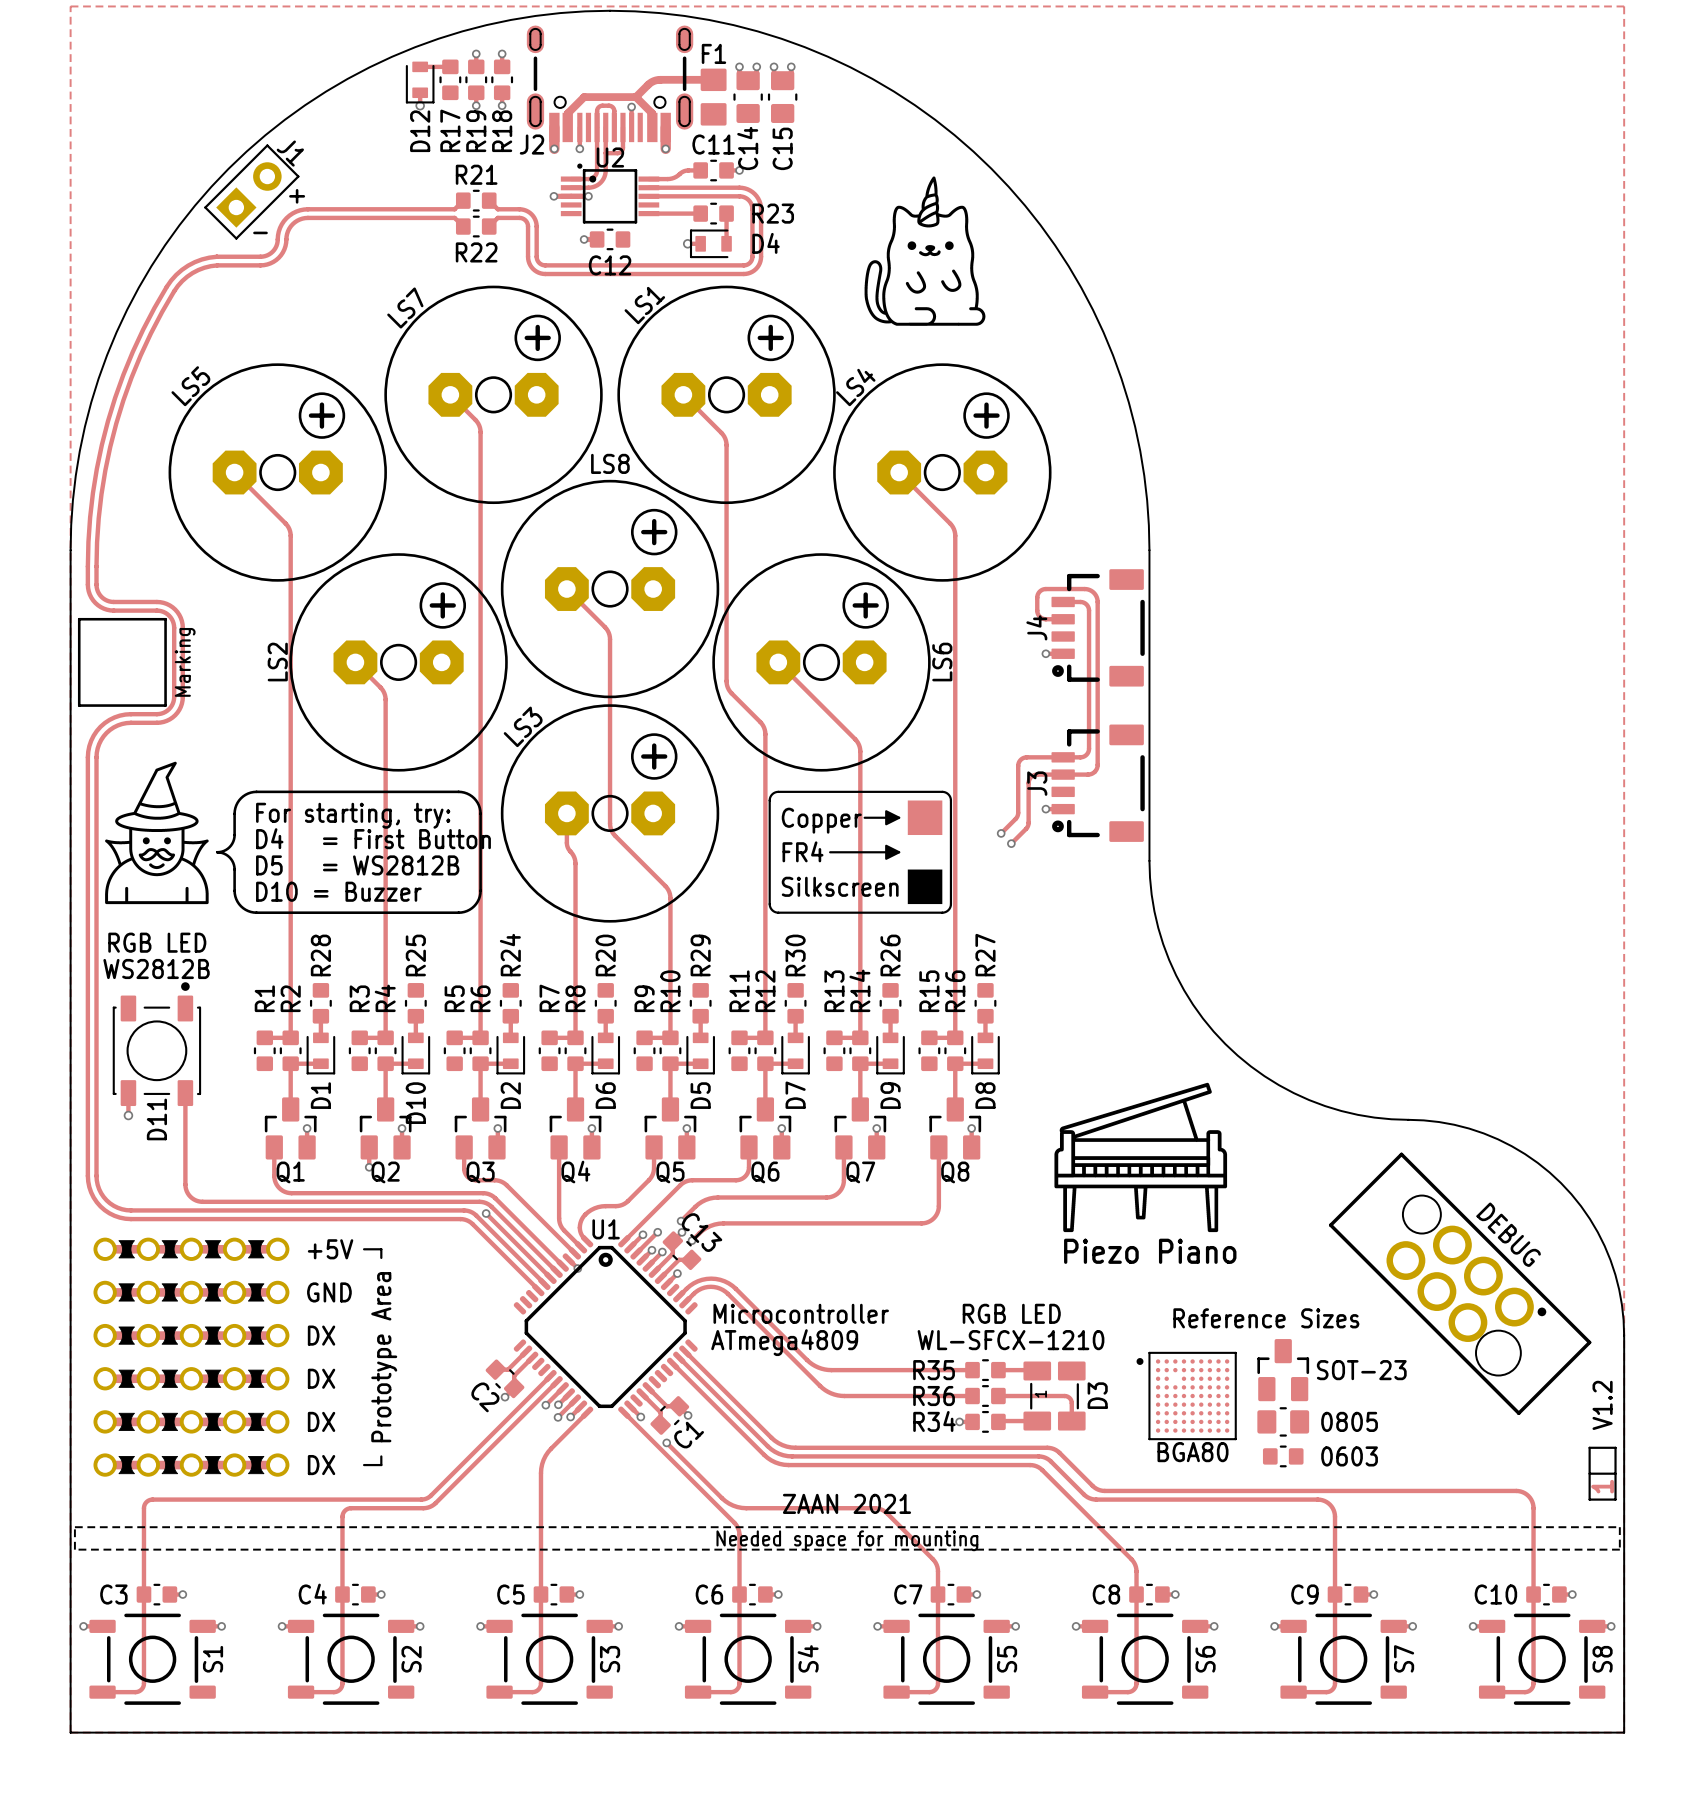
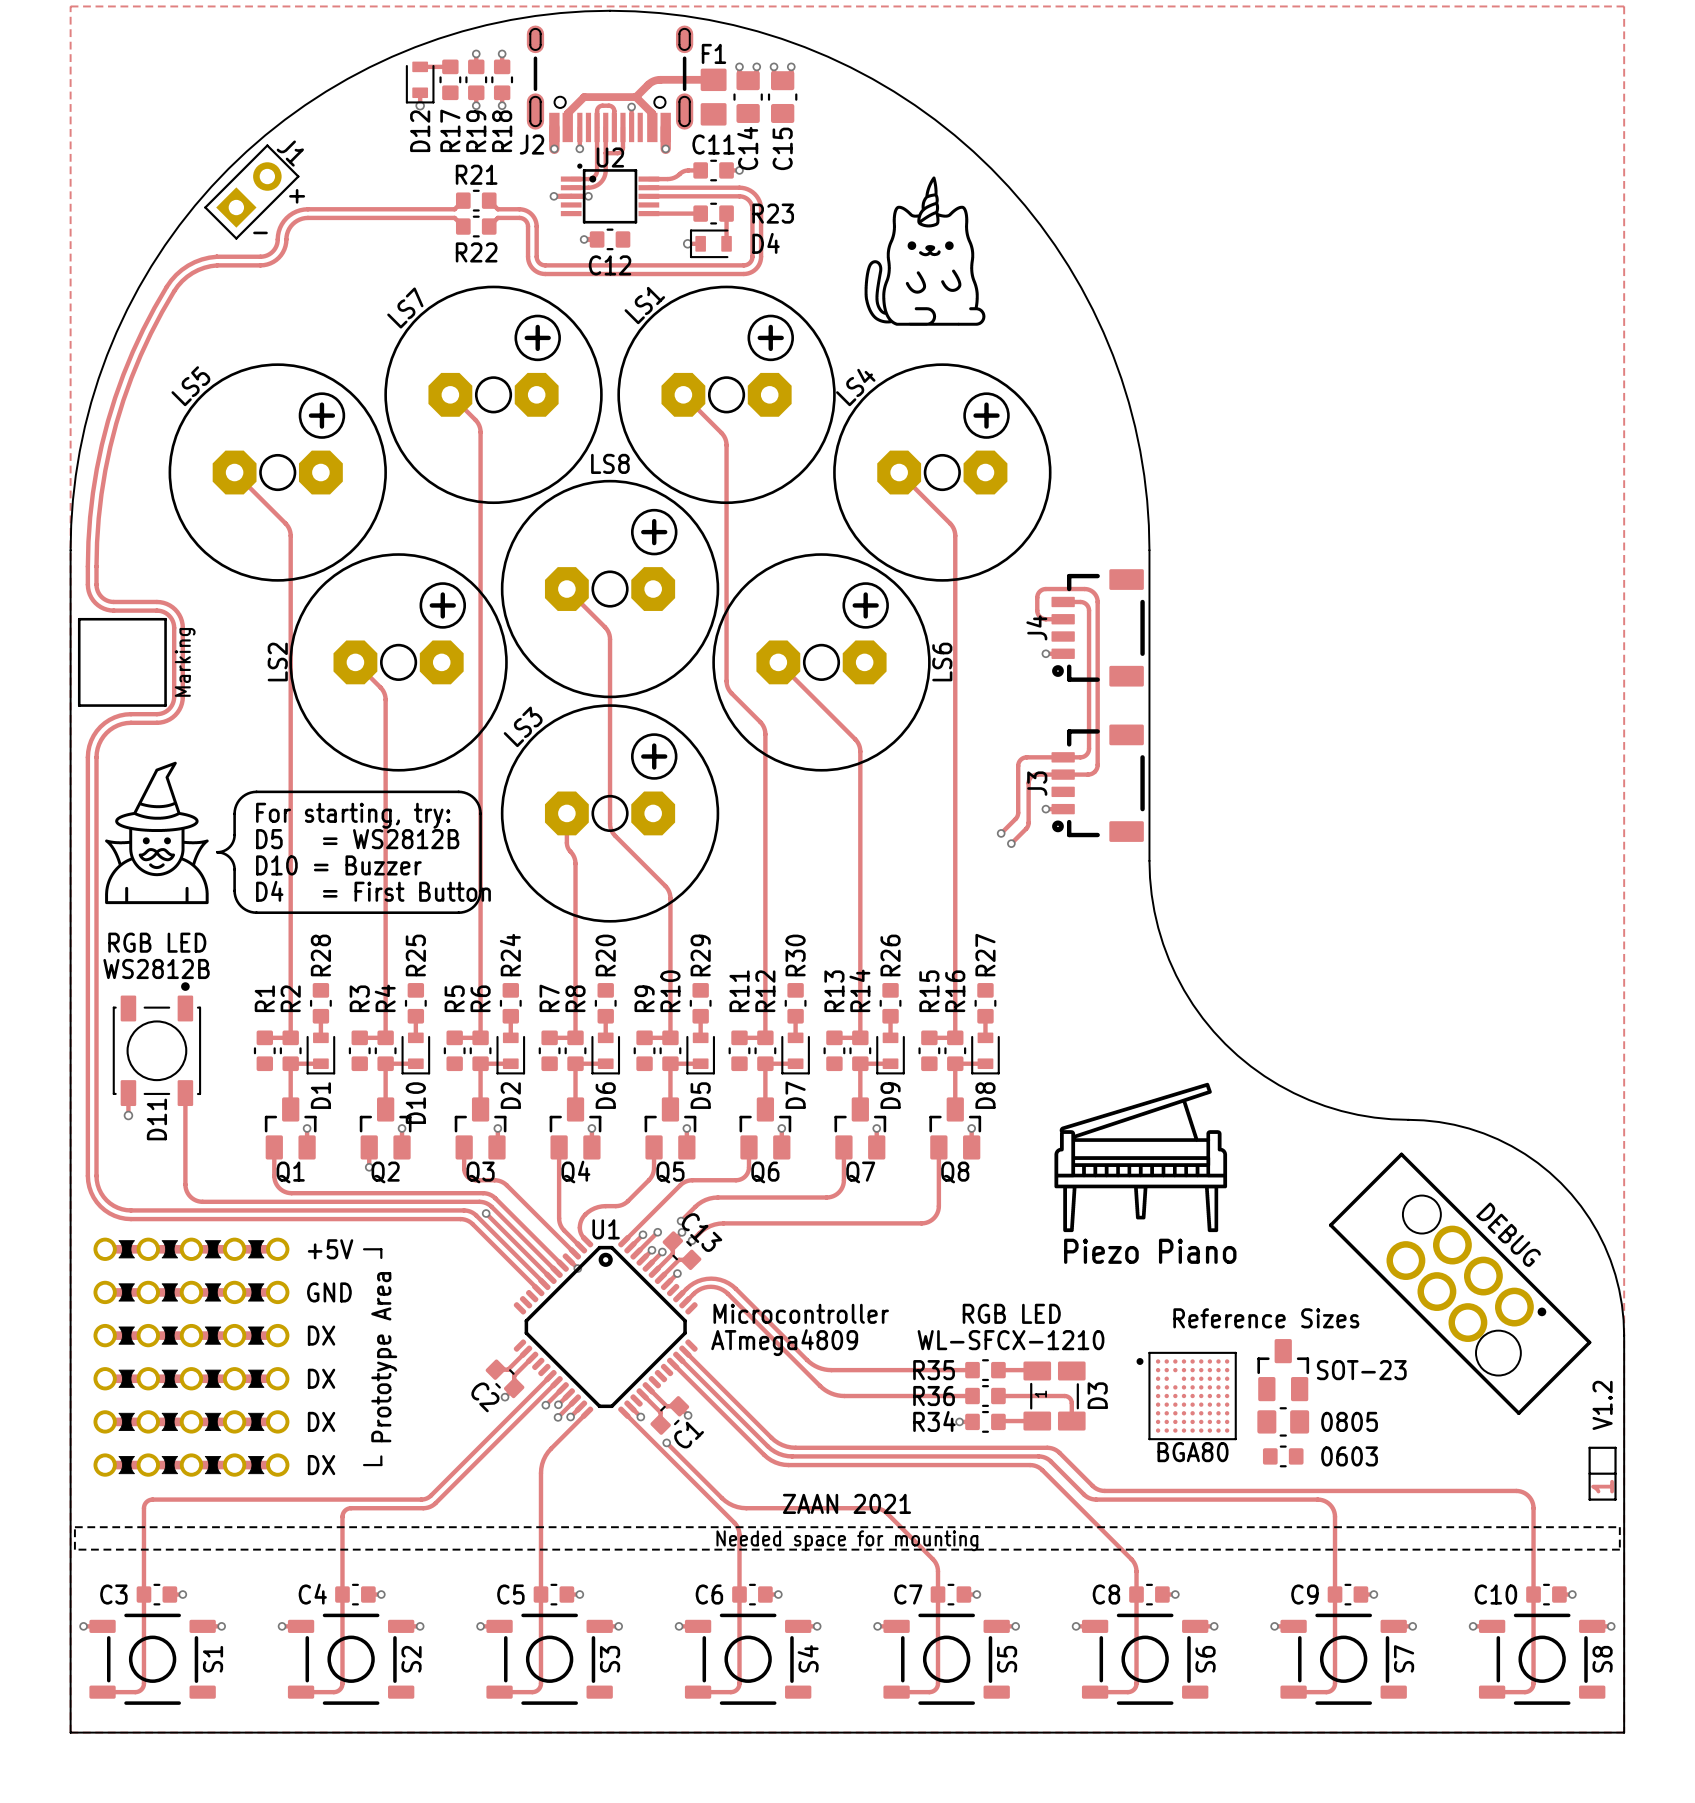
drawing: [768, 790, 953, 914] -> none
text: D4 = First Button (373, 838) -> D5 = WS2812B (357, 839)
text: D5 = WS2812B (357, 865) -> D10 = Buzzer (338, 865)
text: D10 = Buzzer (338, 891) -> D4 = First Button (373, 891)

